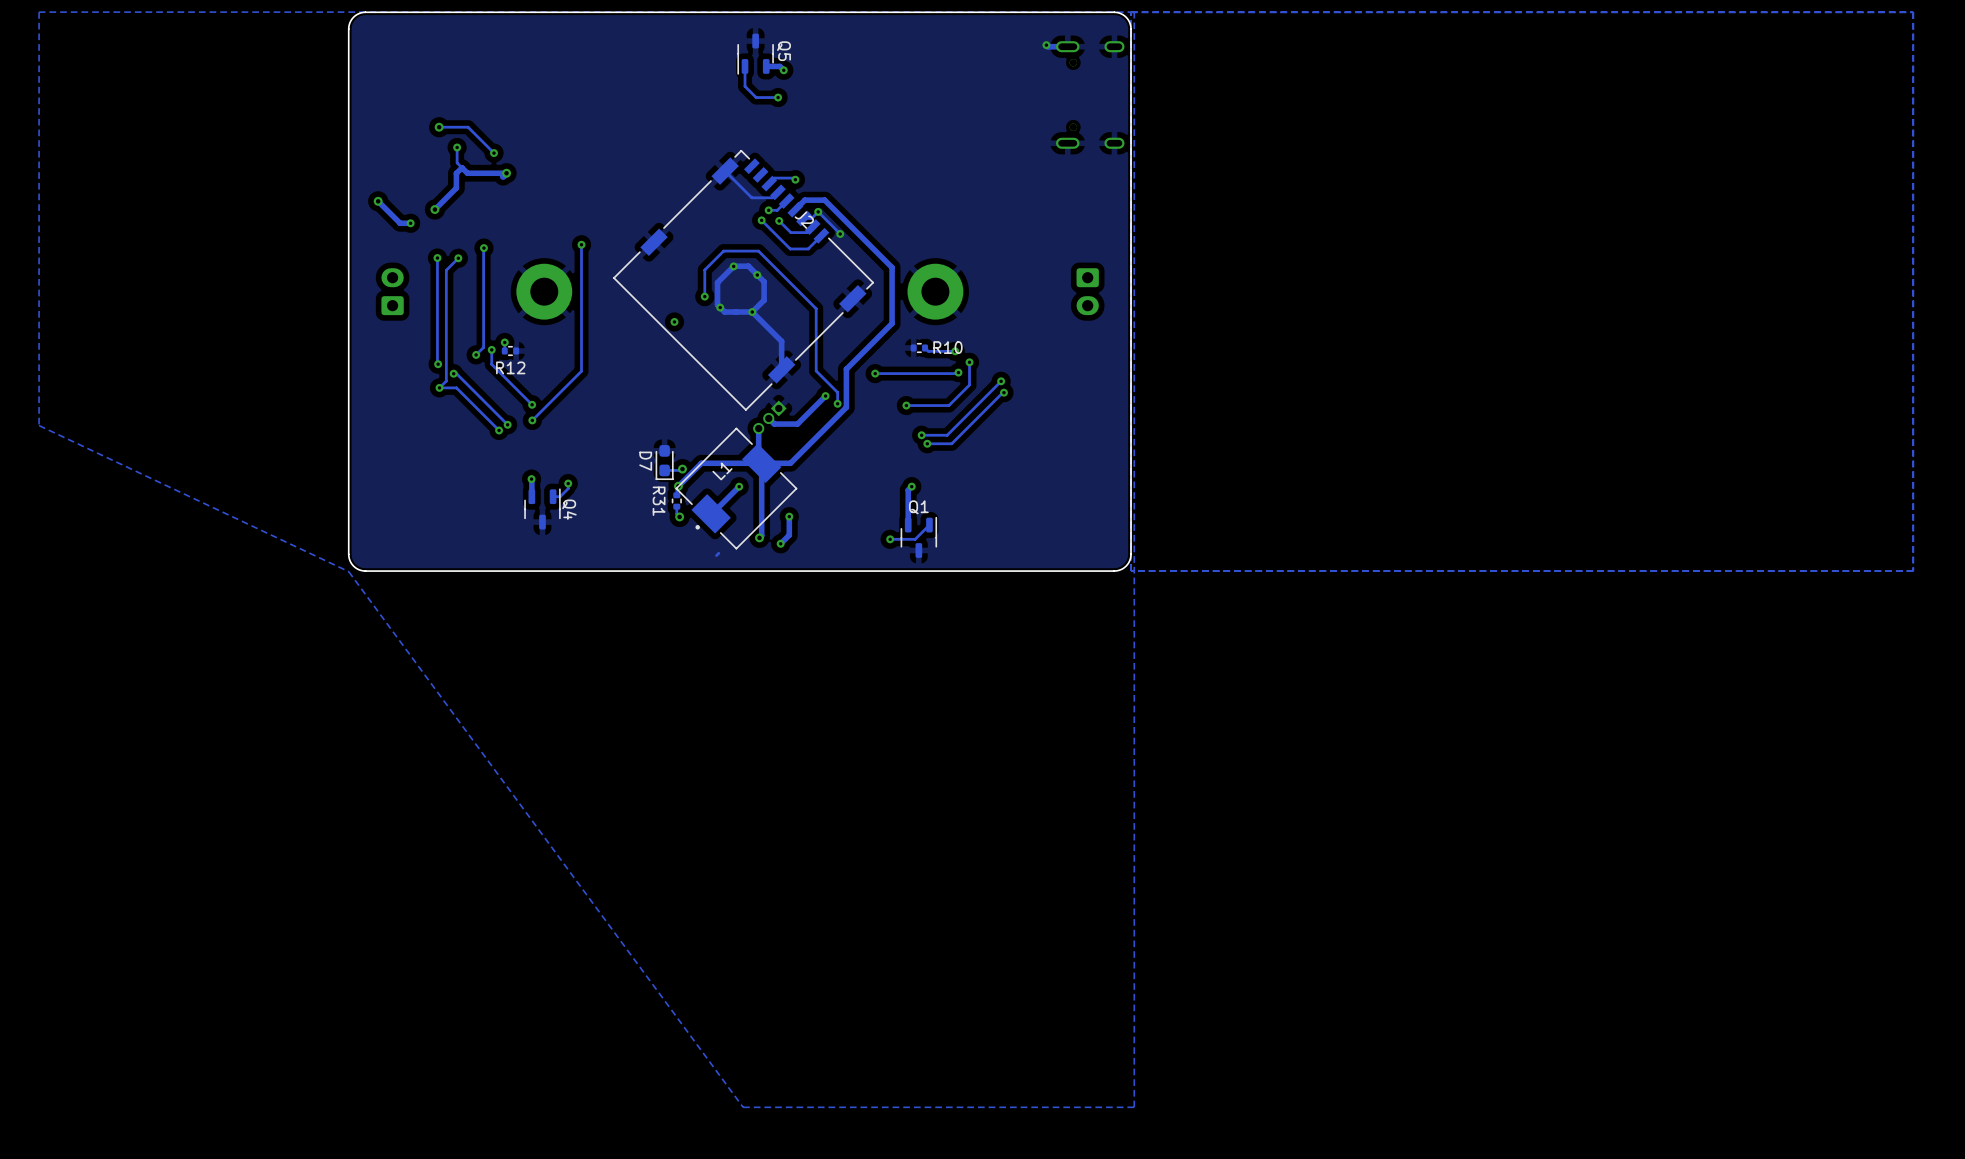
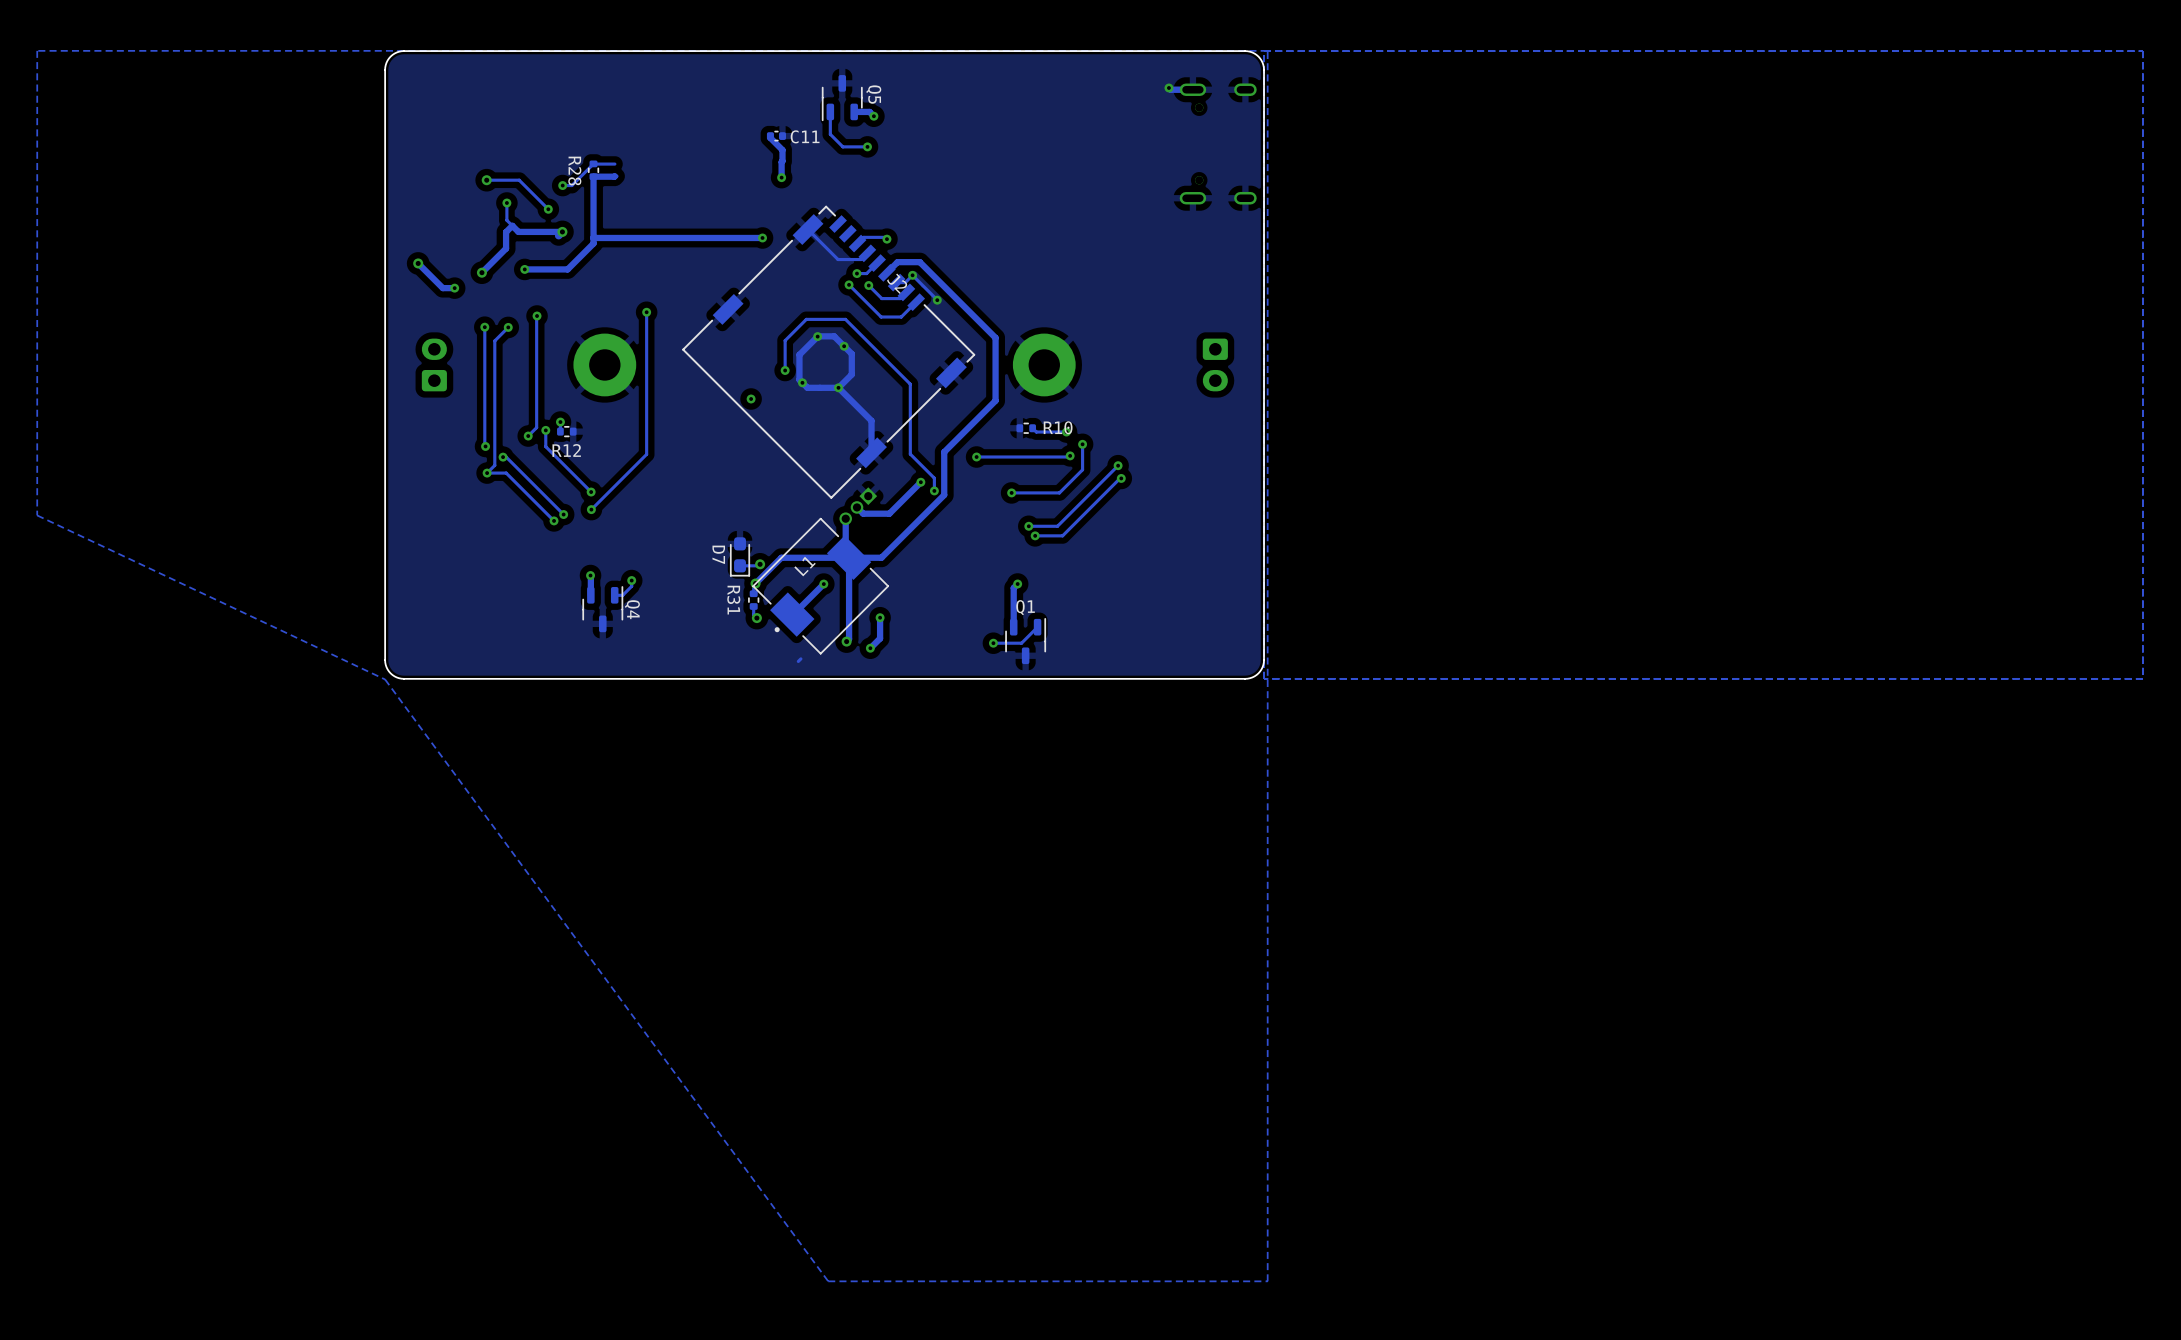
C11: none -> (776, 136)
track: none -> (770, 136) (782, 150) (781, 177)
track: none -> (614, 164) (593, 163) (571, 185) (562, 185)
R28: none -> (593, 170)
track: none -> (617, 176) (593, 176) (593, 243) (567, 269) (524, 269)
via: none -> (781, 177)
via: none -> (562, 185)
track: none -> (762, 237) (593, 237)
via: none -> (762, 237)
via: none -> (524, 269)

